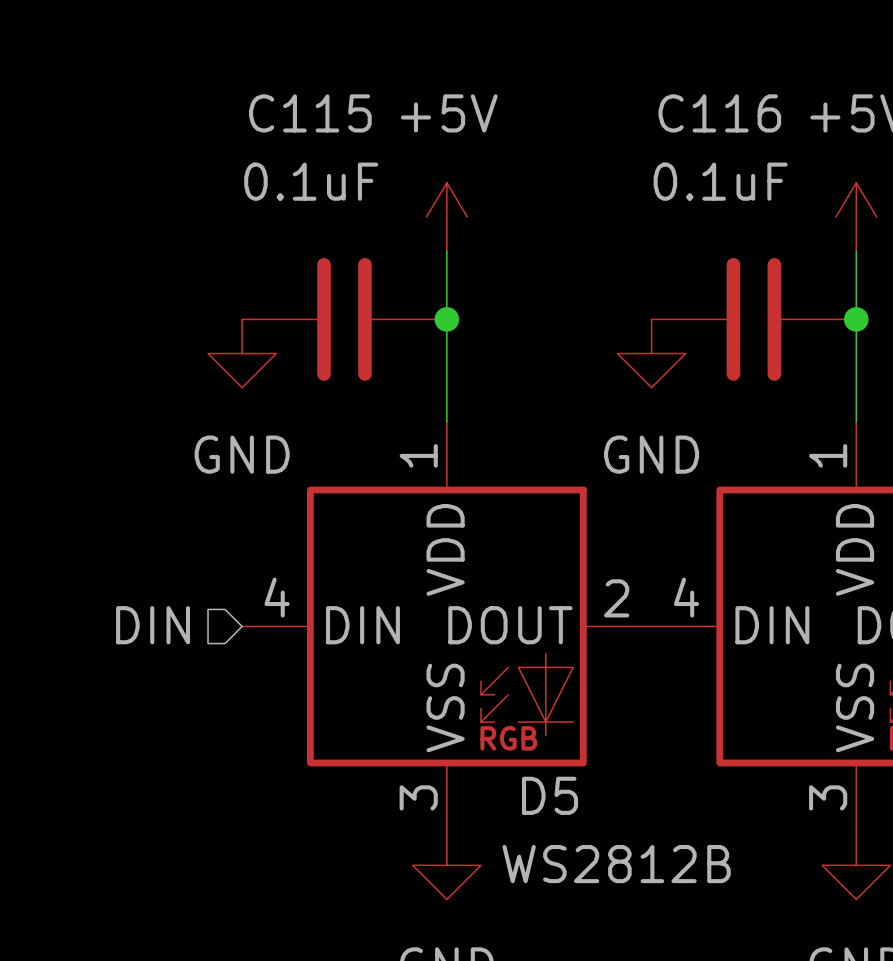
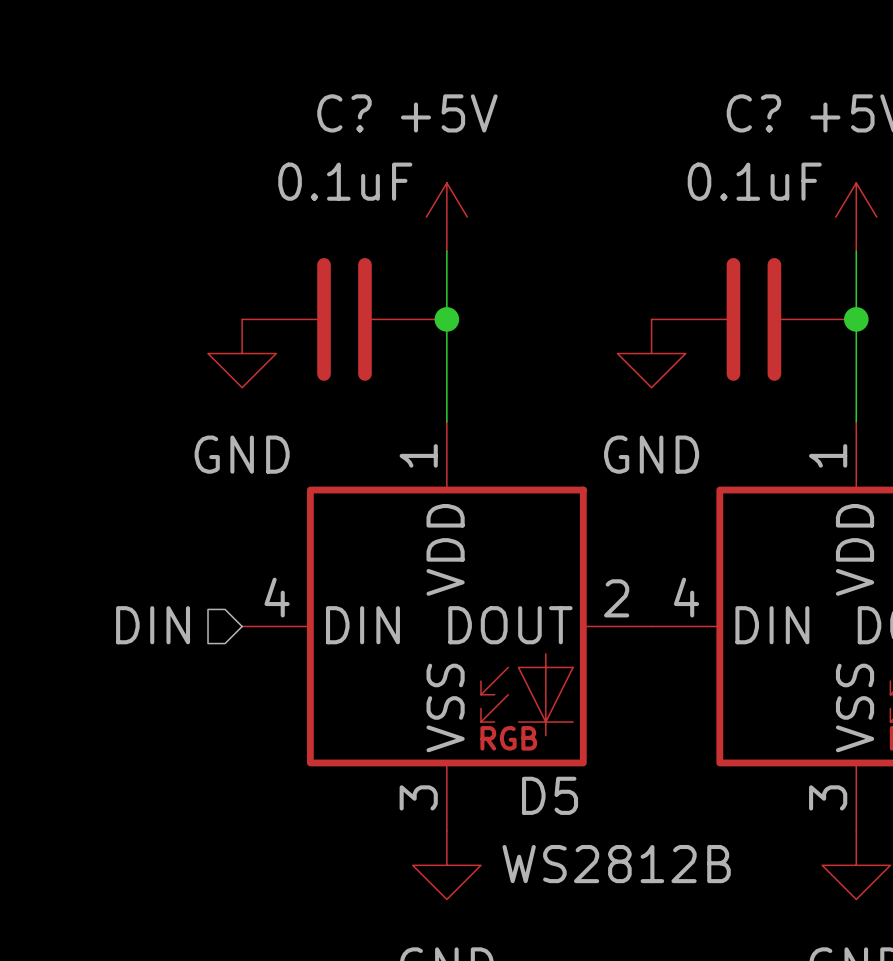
C115 name: C115 (310, 113) -> C? (344, 113)
C116 name: C116 (719, 113) -> C? (753, 113)
C115 value position: 0.1uF (311, 181) -> 0.1uF (345, 181)
C116 value position: 0.1uF (720, 181) -> 0.1uF (754, 181)

